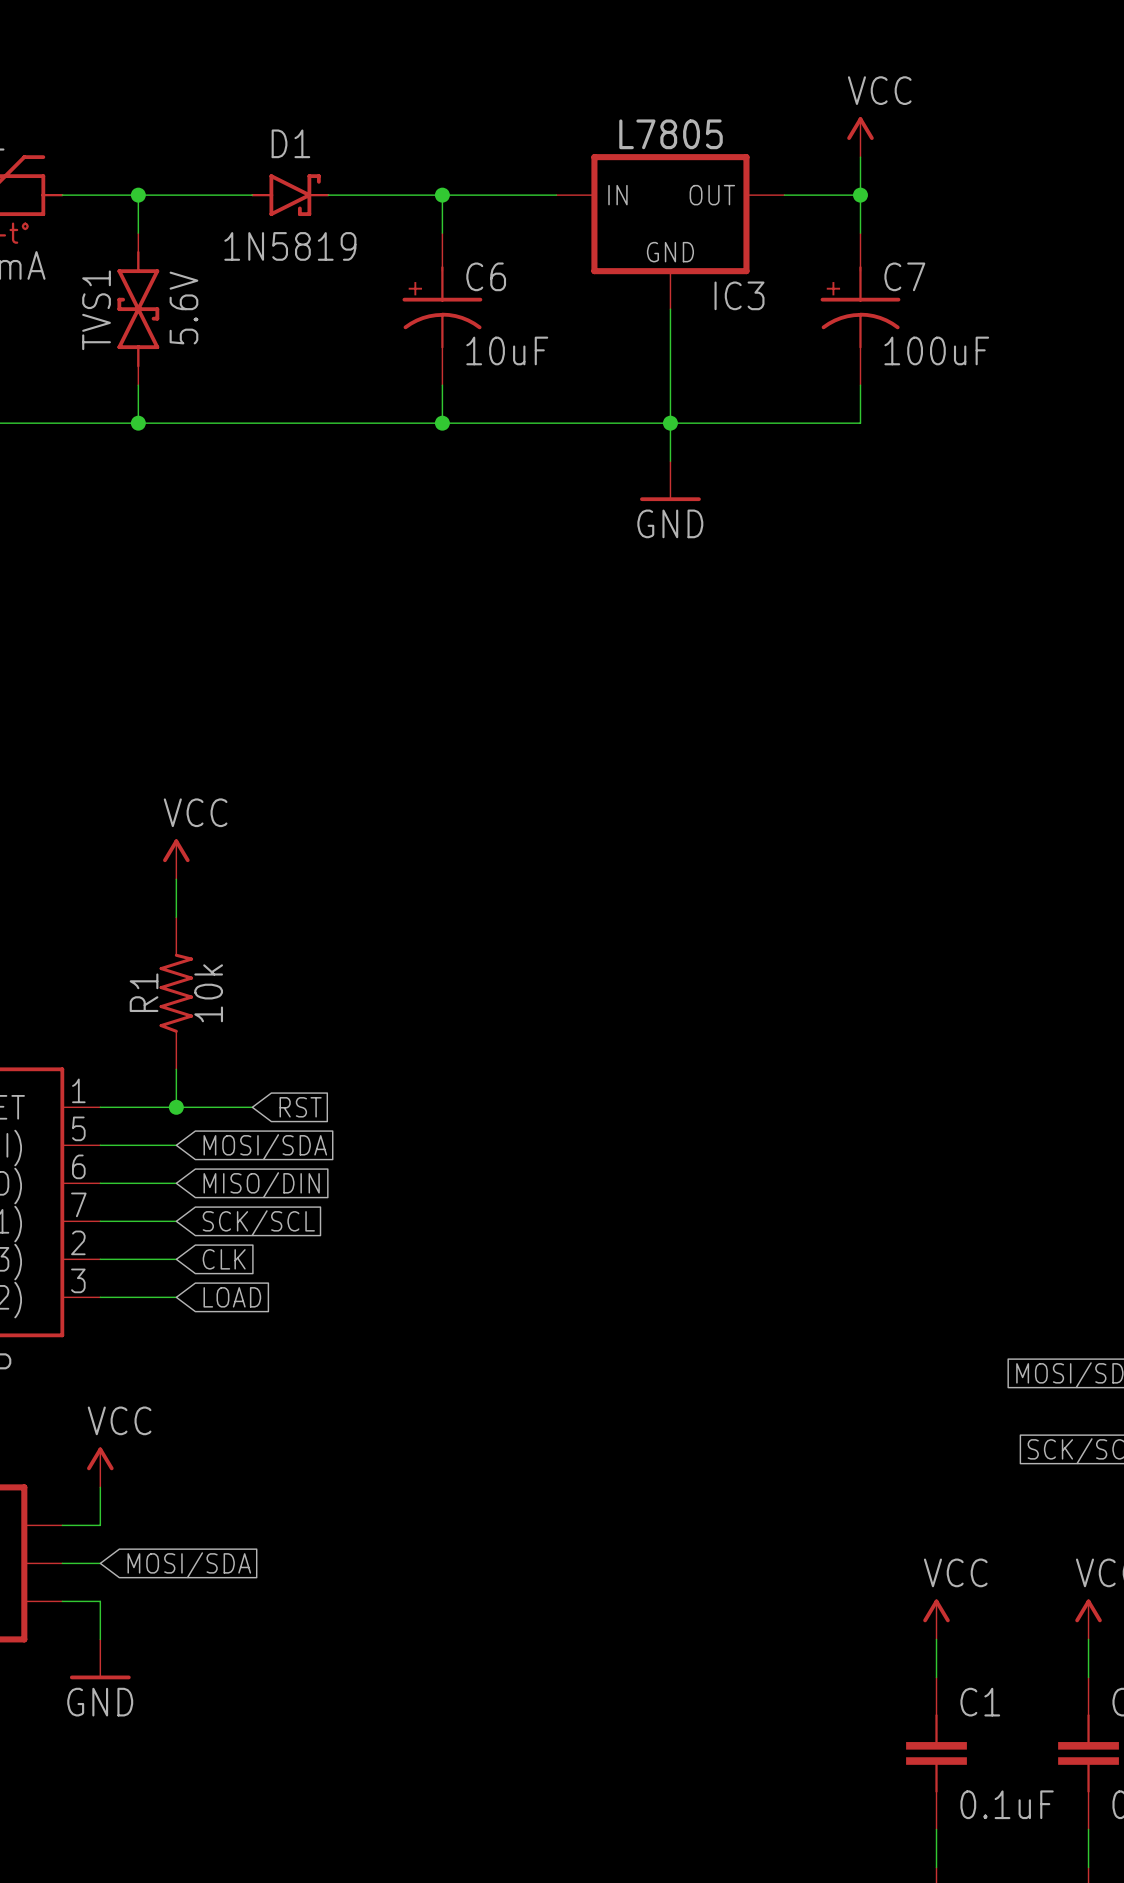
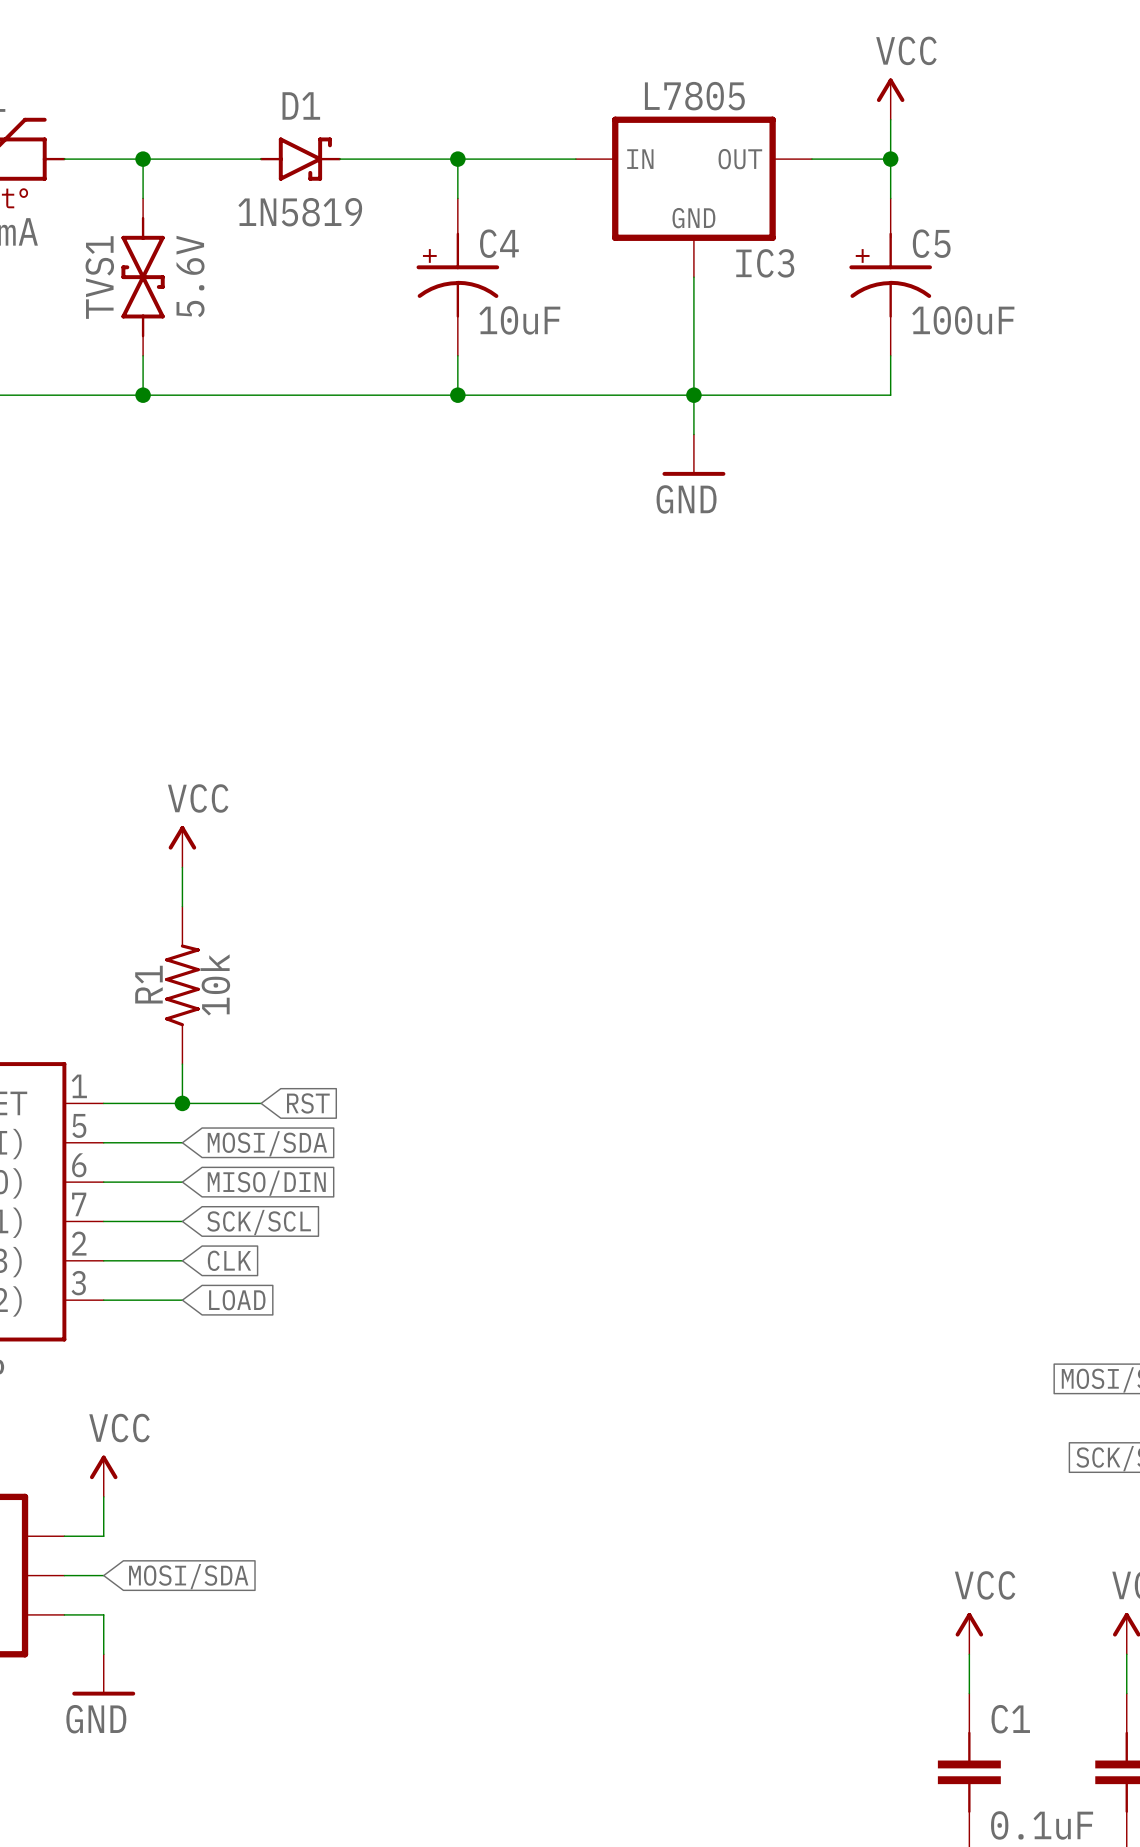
C6 name: C6 (486, 276) -> C4 (499, 243)
C7 name: C7 (904, 276) -> C5 (931, 243)

